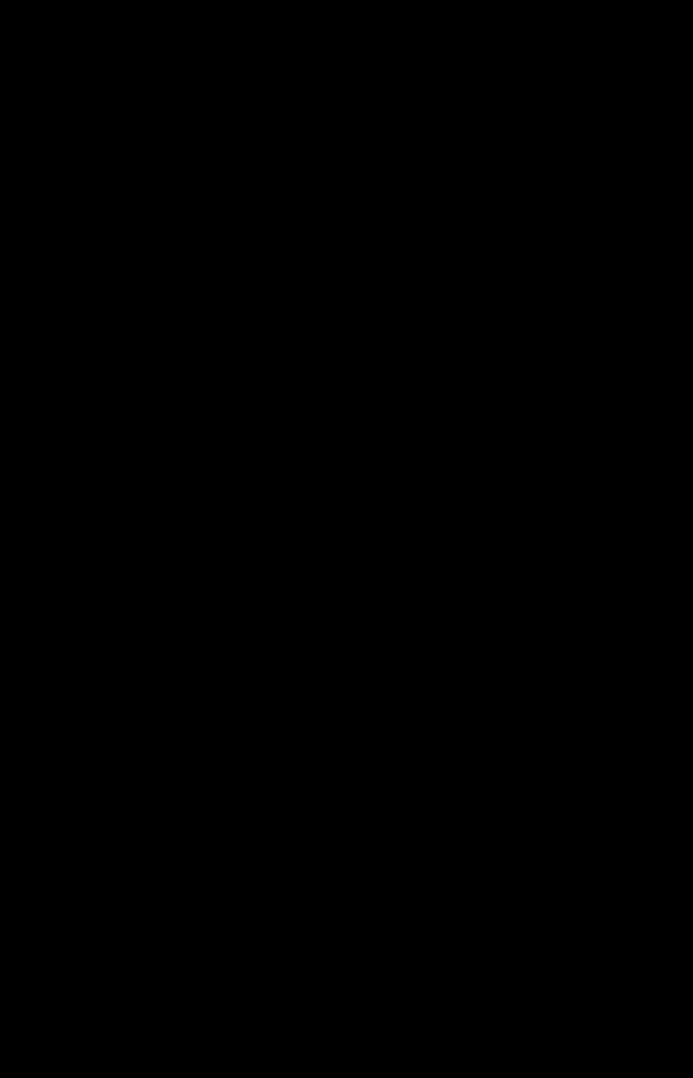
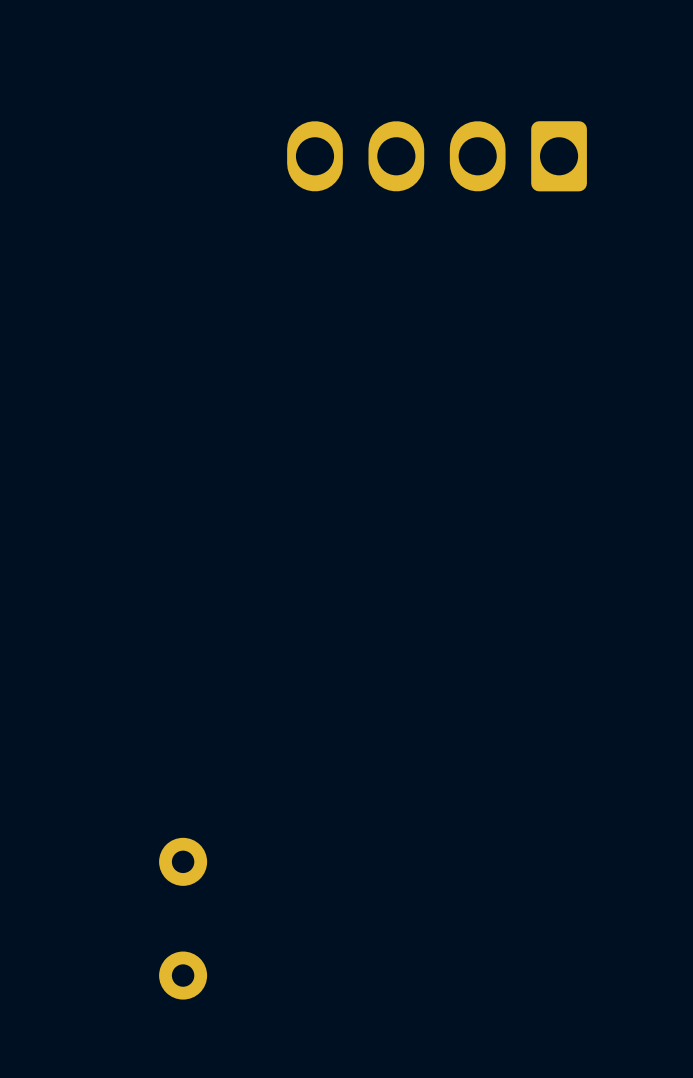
part: none -> (437, 156)
part: none -> (183, 861)
part: none -> (183, 975)

